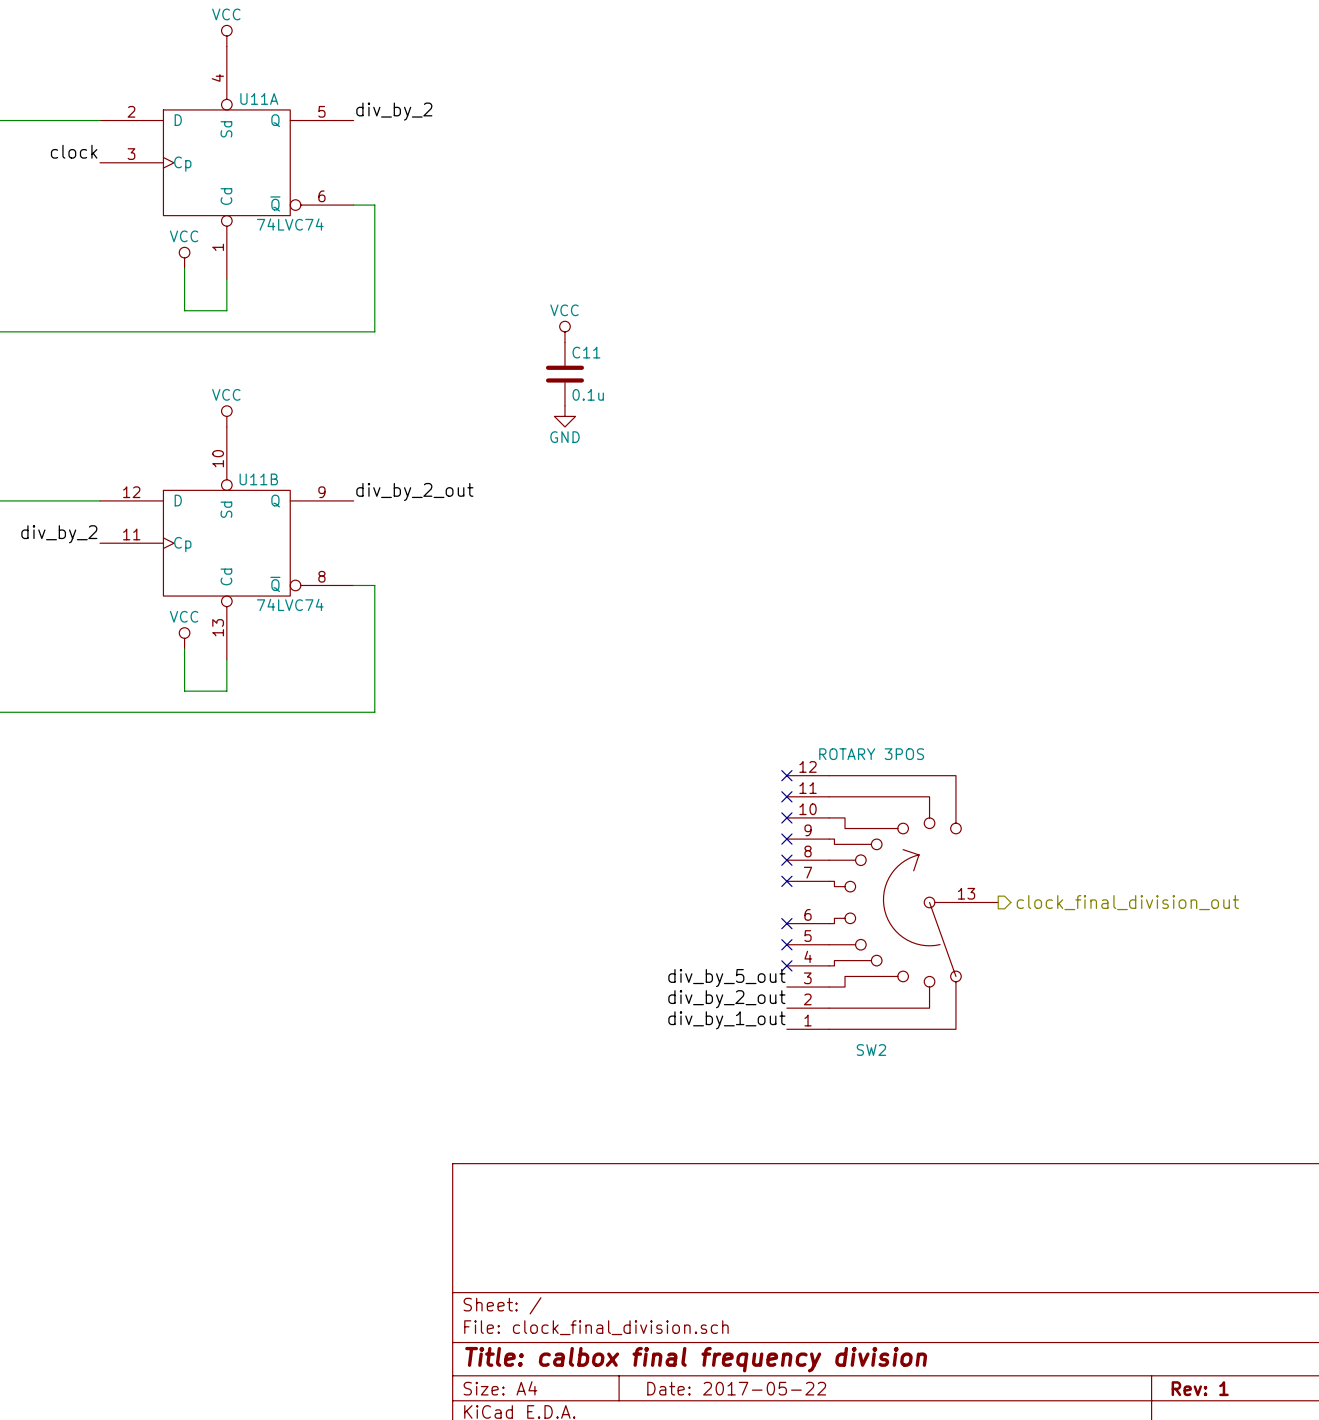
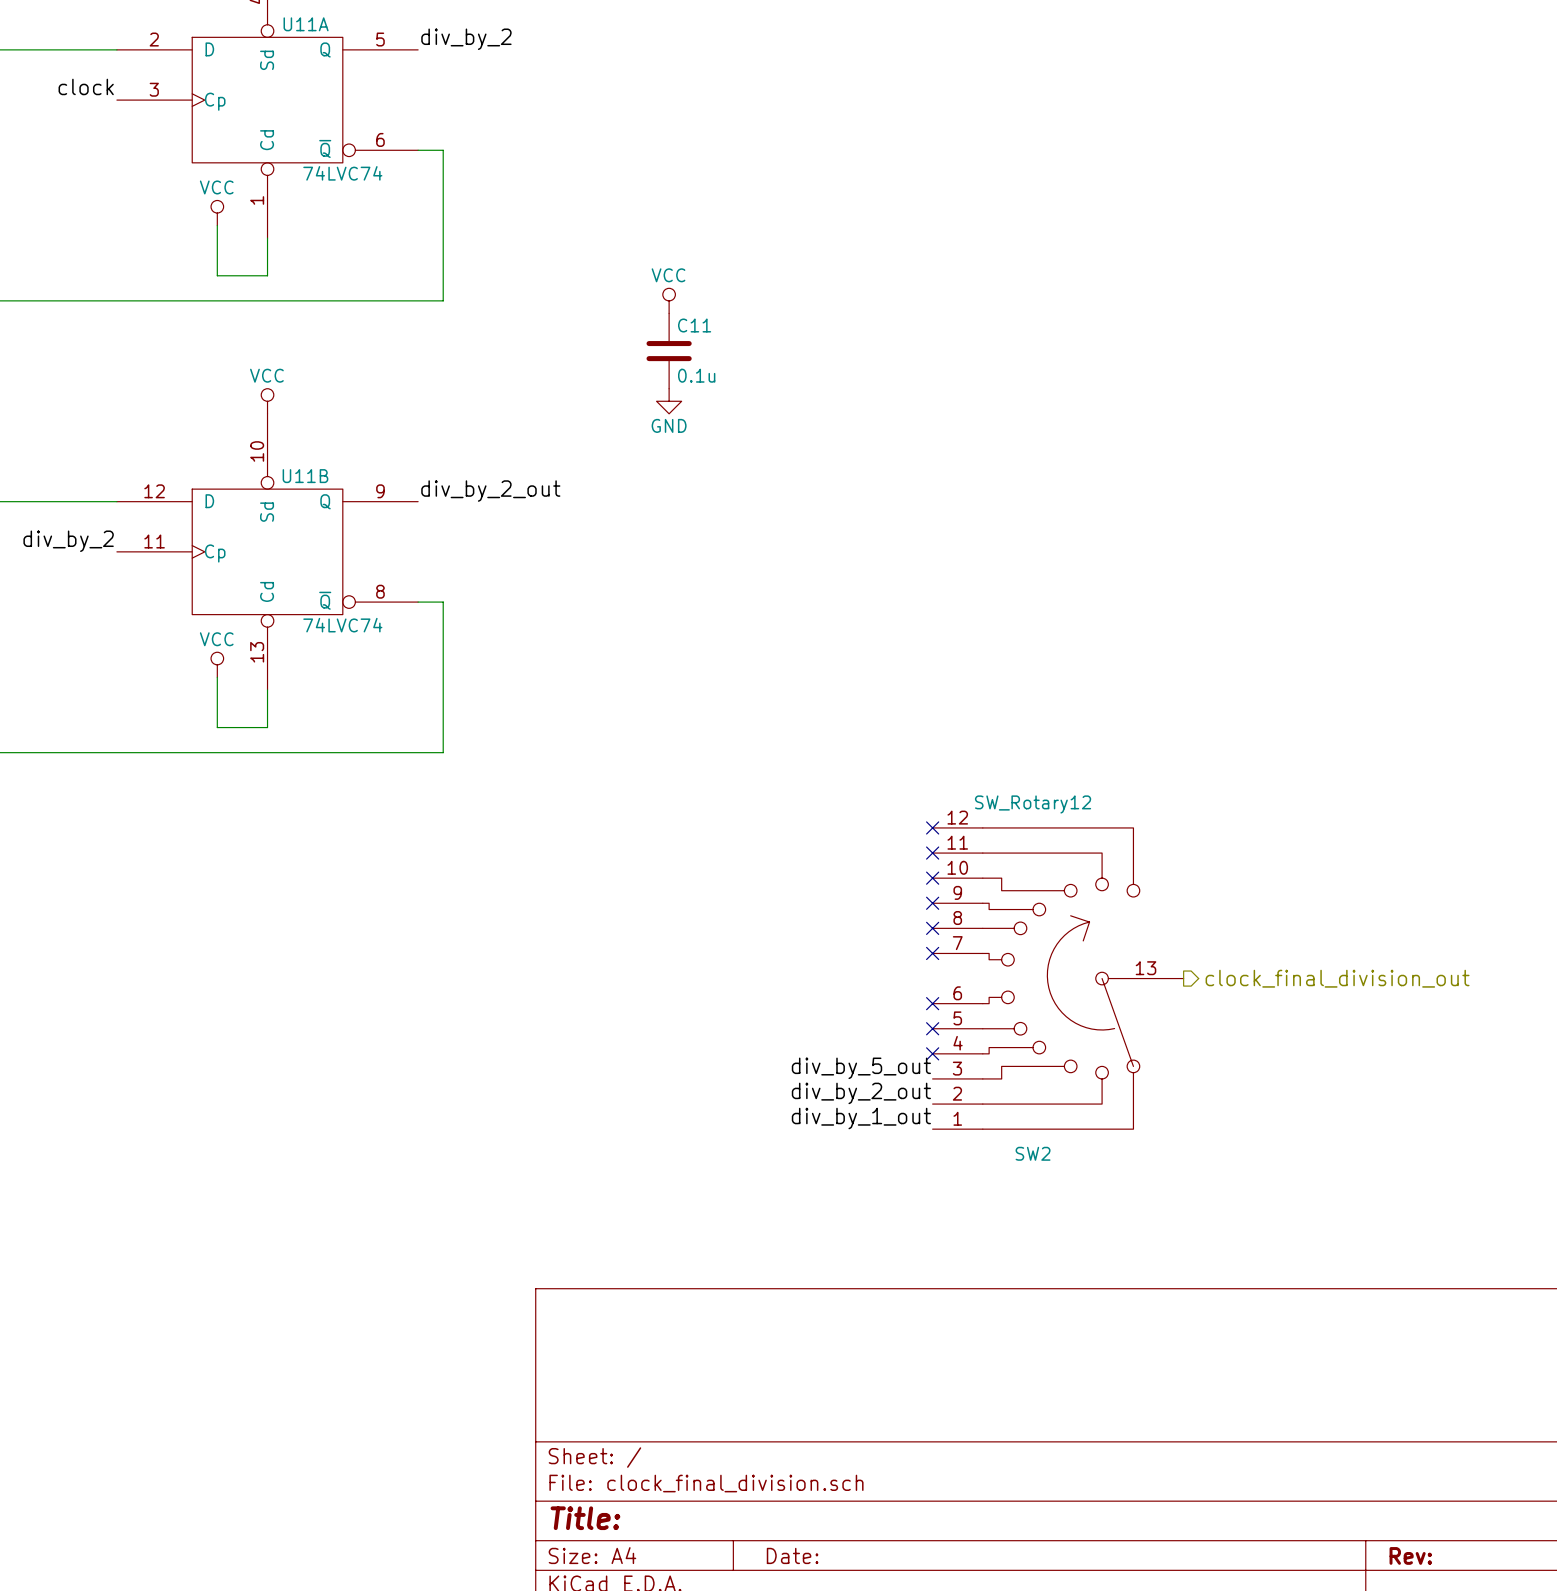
SW2 value: ROTARY 3POS (871, 754) -> SW_Rotary12 (1033, 804)
title block: Title: calbox final frequency division (696, 1359) -> Title: (585, 1518)
title block: Date: 2017-05-22 (736, 1388) -> Date: (792, 1555)
title block: Rev: 1 (1200, 1388) -> Rev: (1410, 1555)

